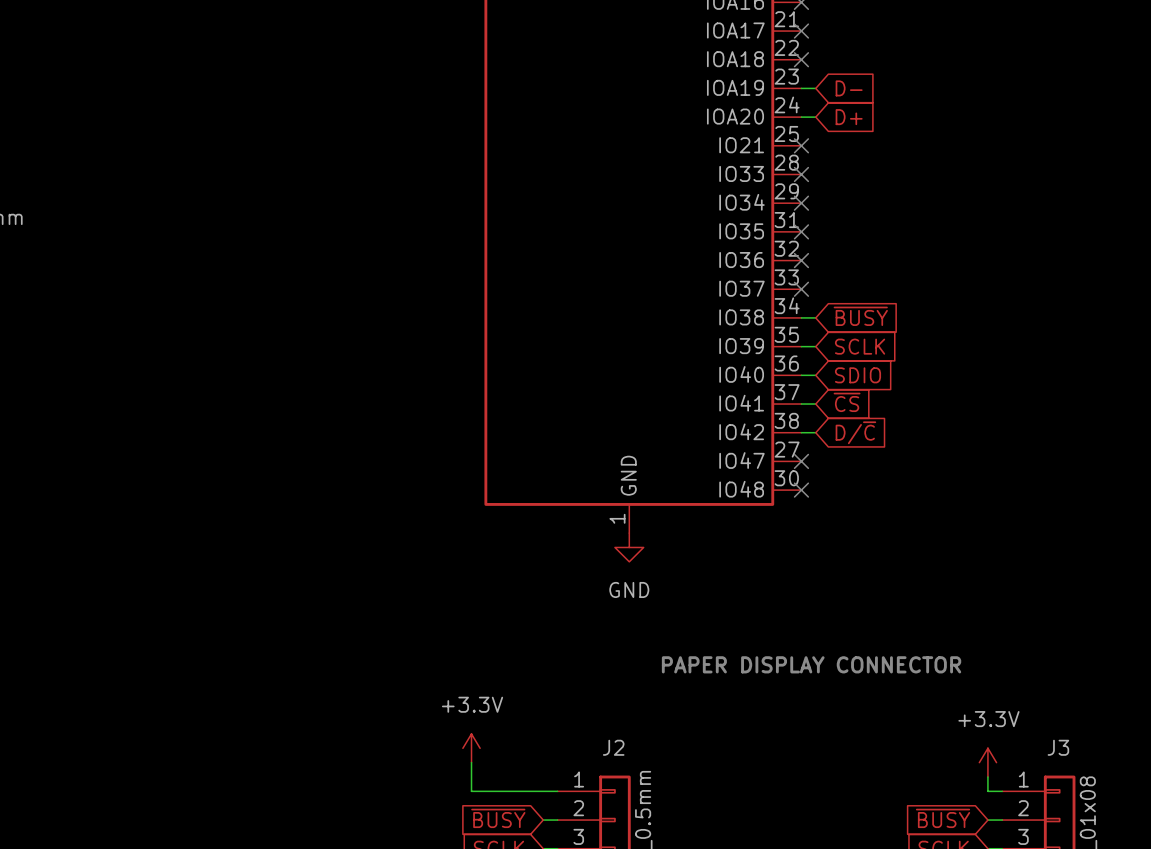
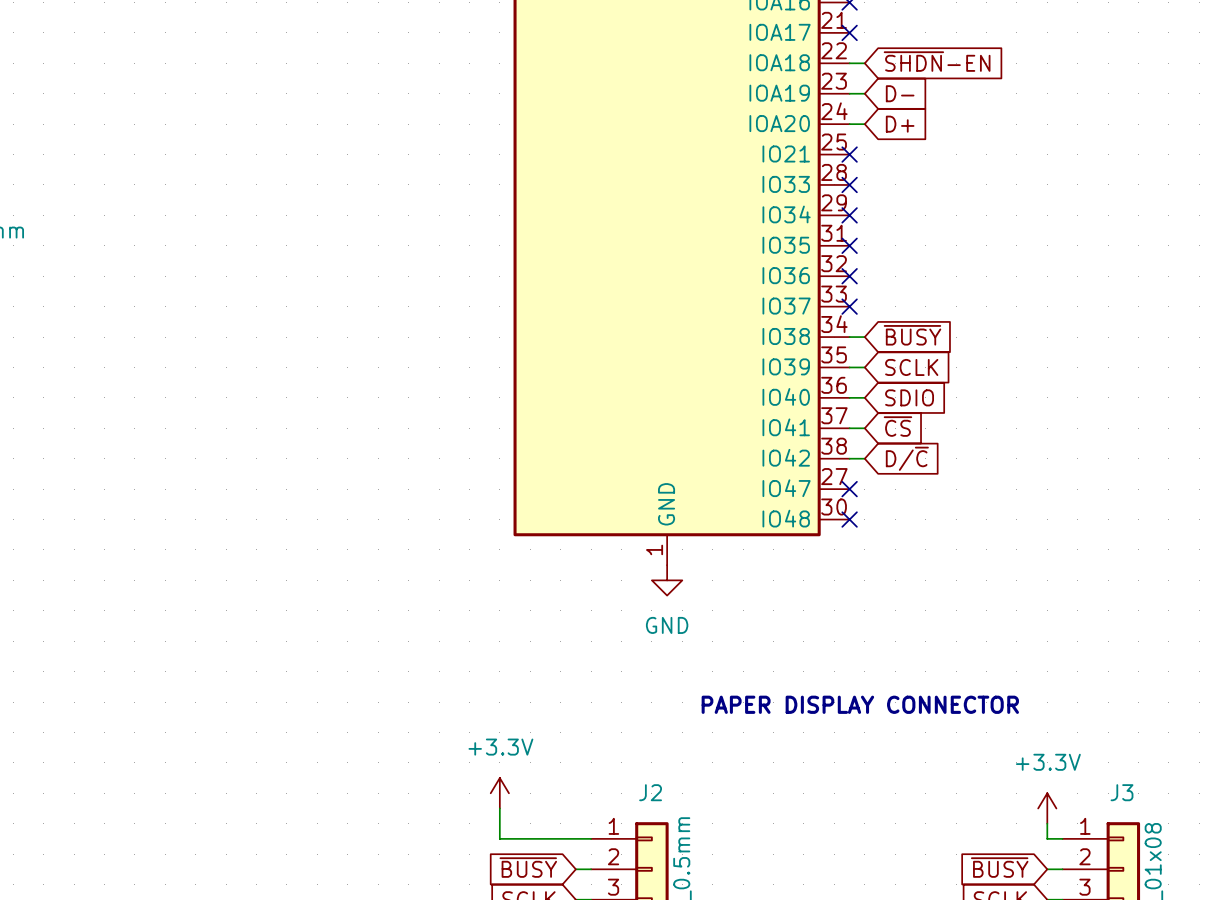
global label: none -> ~{SHDN}-EN (937, 61)
wire: none -> (849, 63) (864, 63)
no-connect mark: (801, 59) -> none

